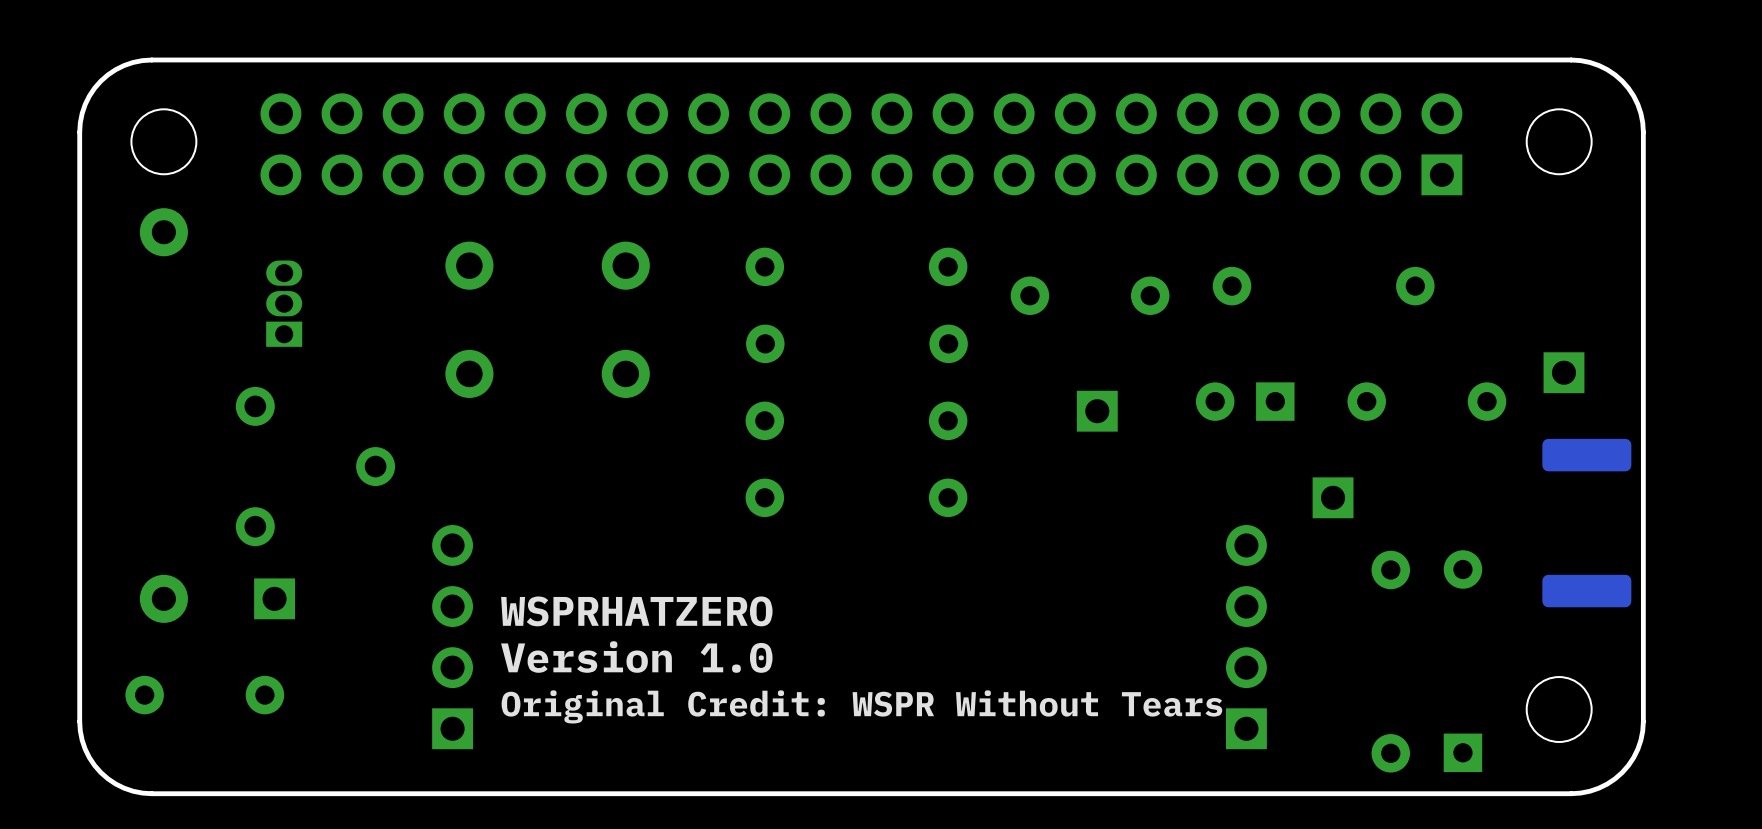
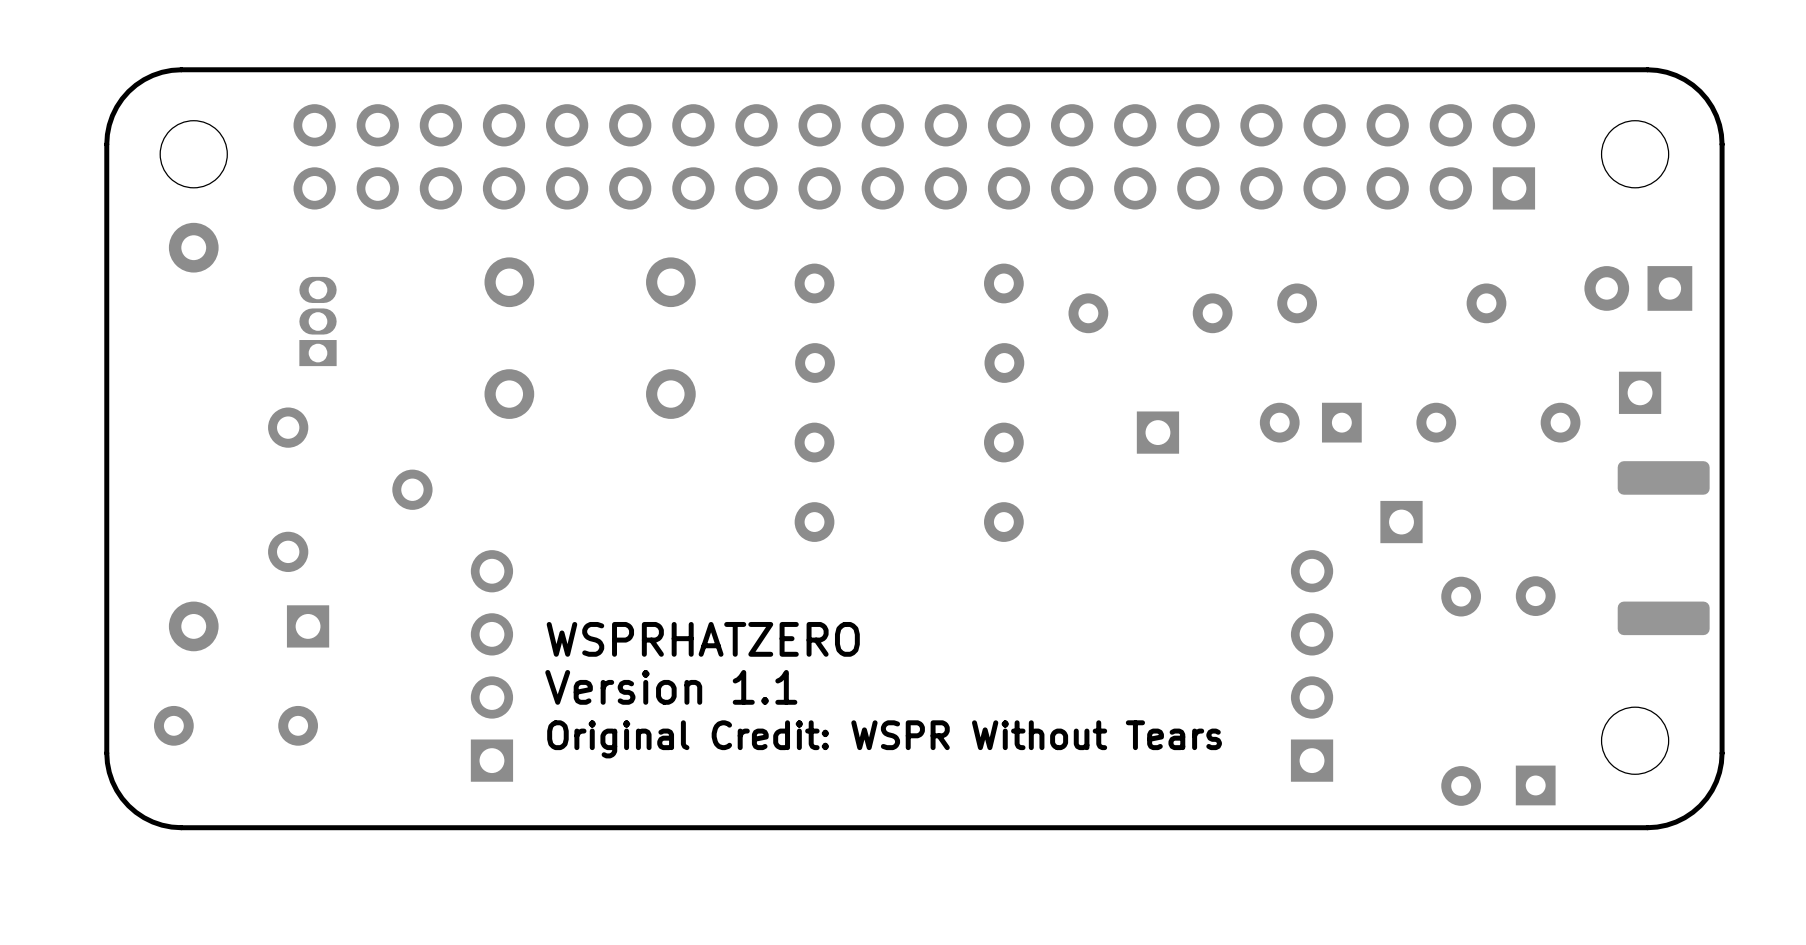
part: none -> (1638, 288)
text: Version 1.0 (636, 657) -> Version 1.1 (671, 687)

